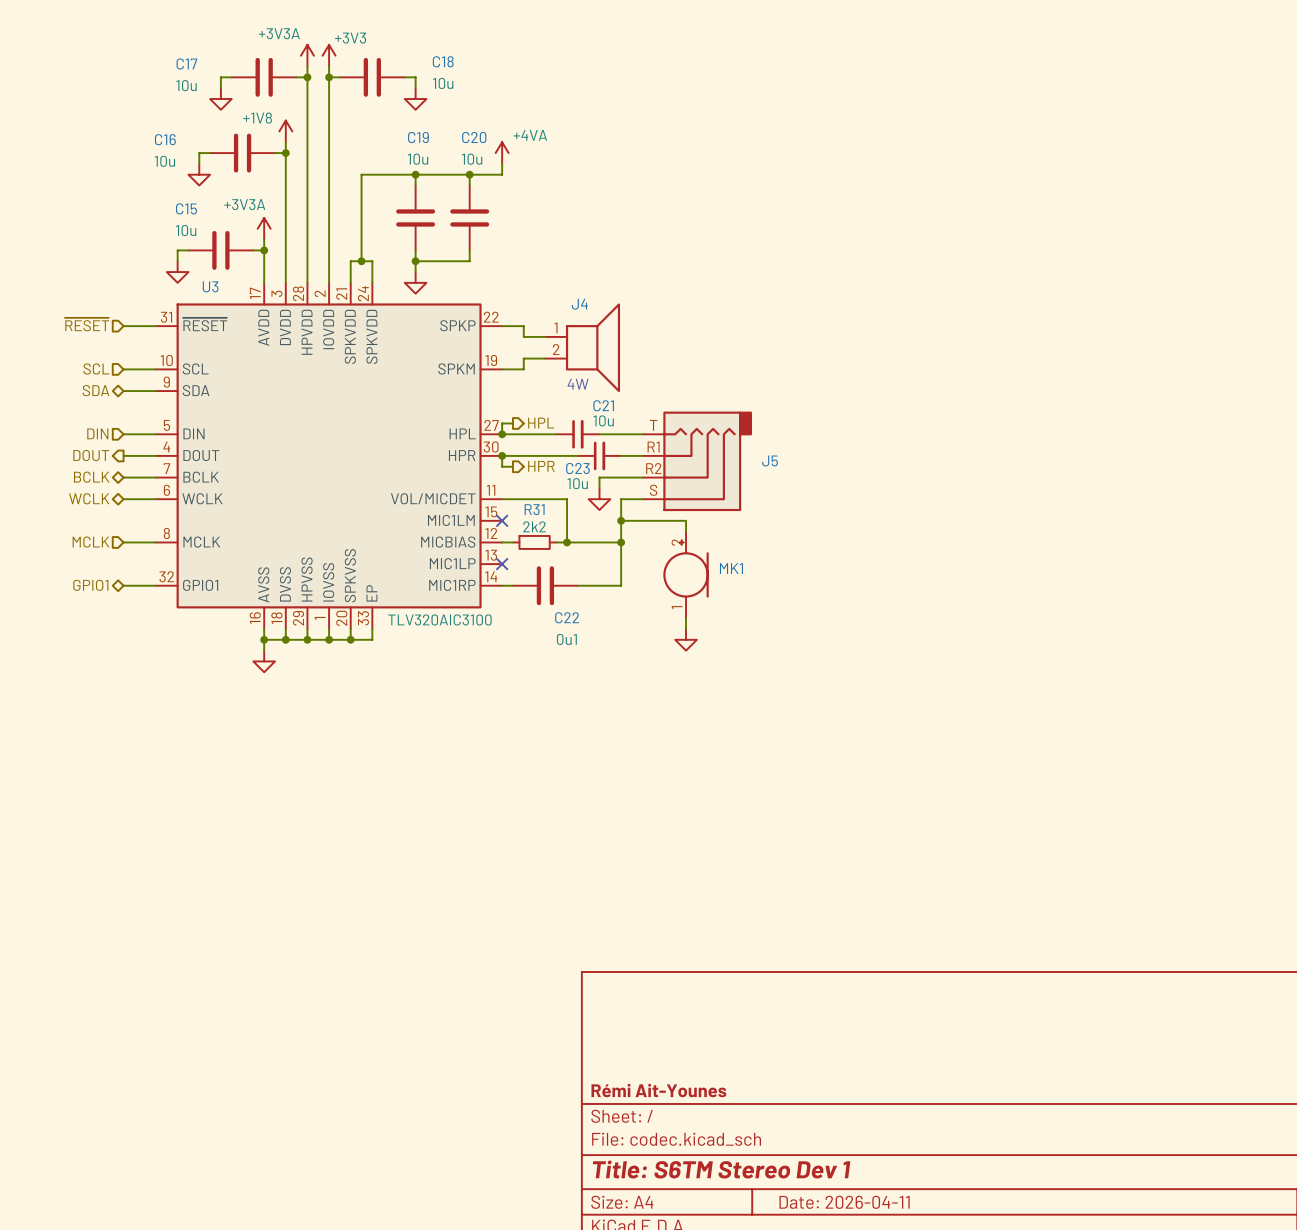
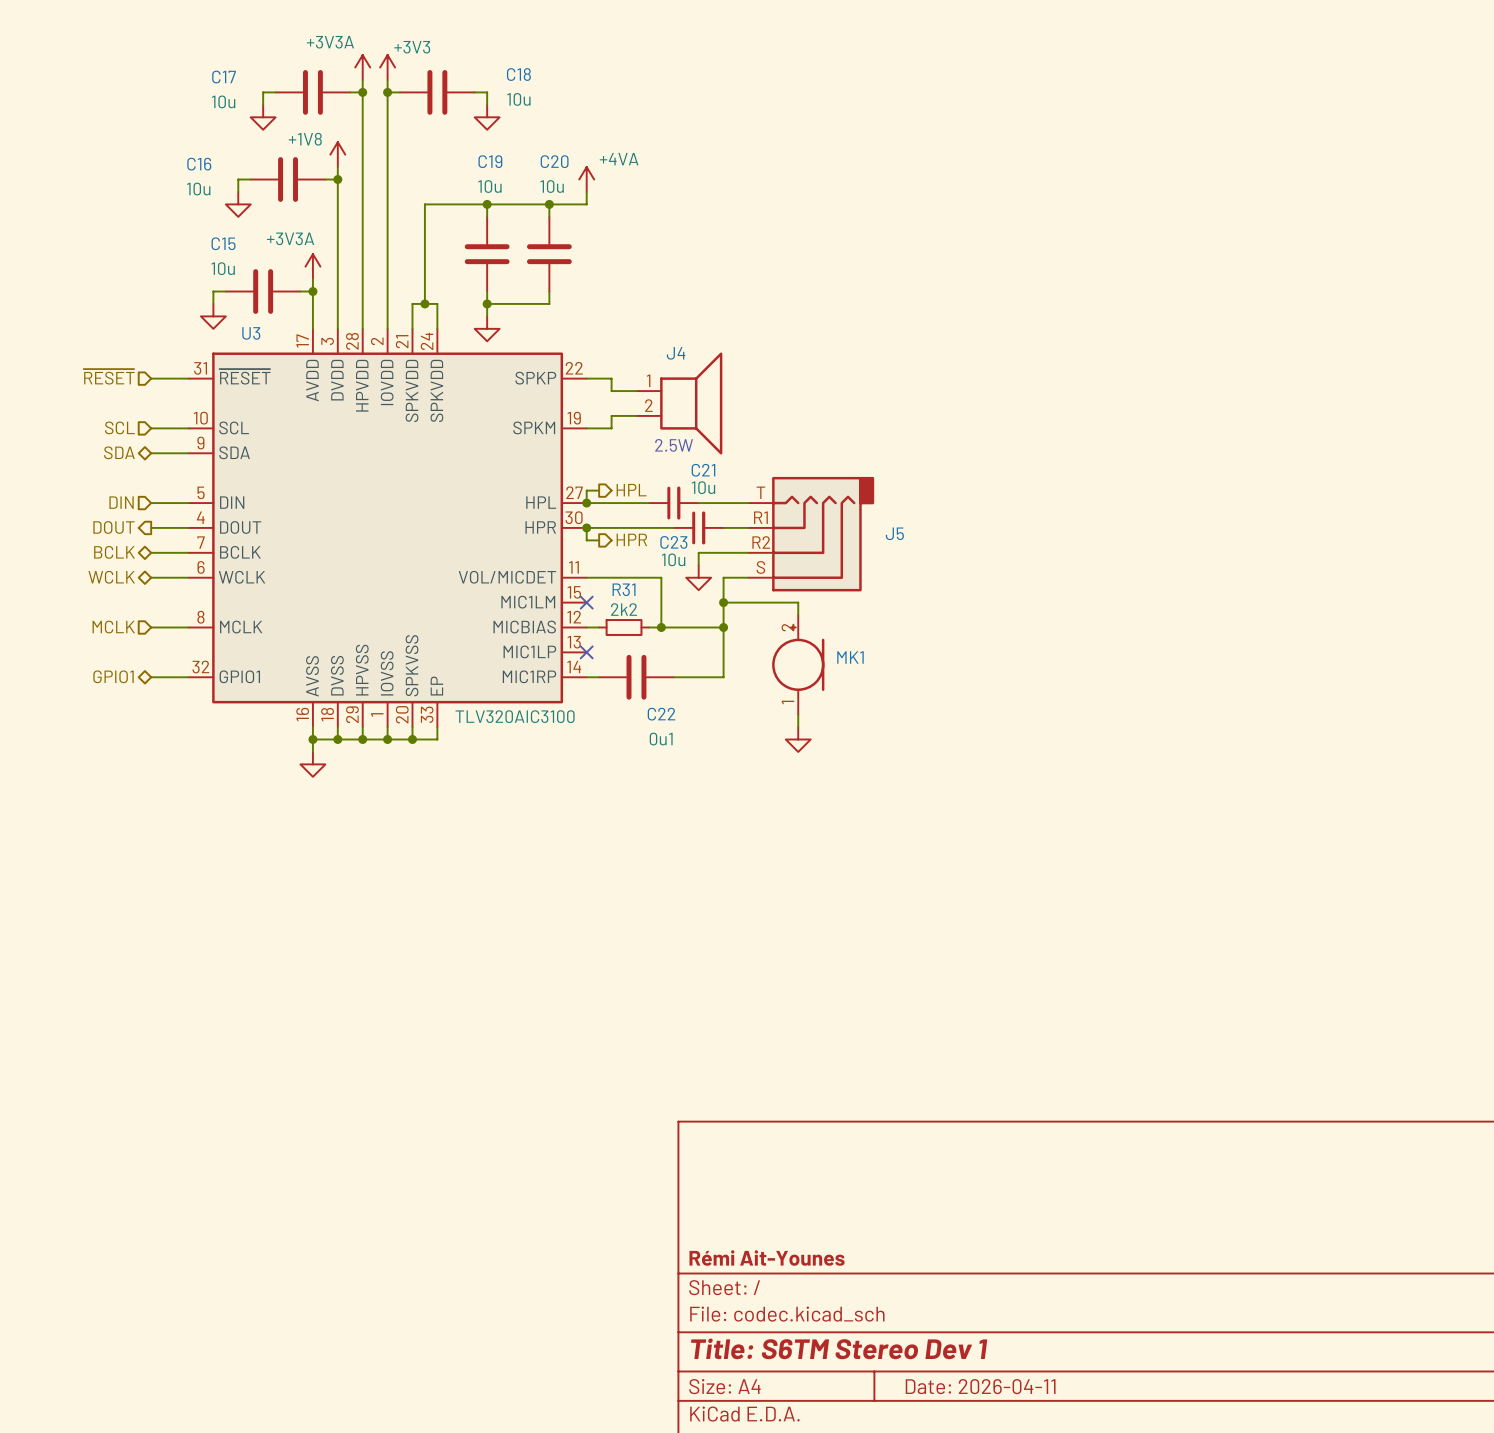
text: 4W (578, 384) -> 2.5W (674, 445)

